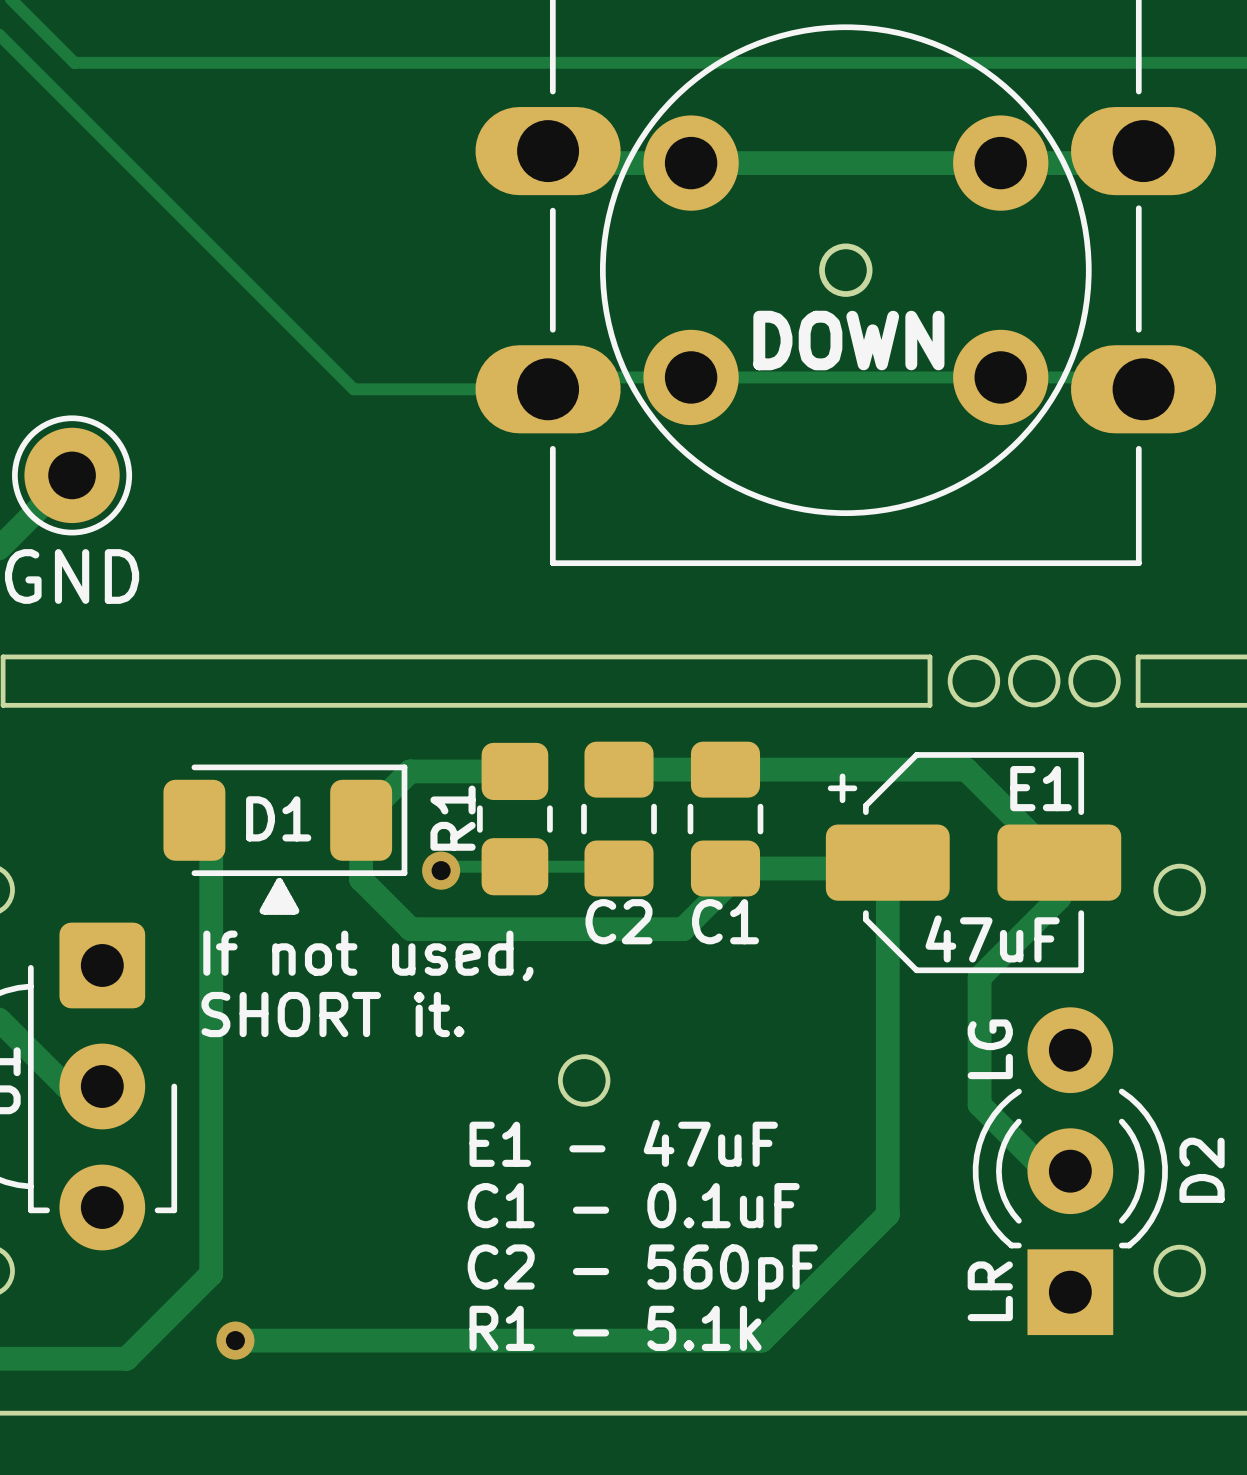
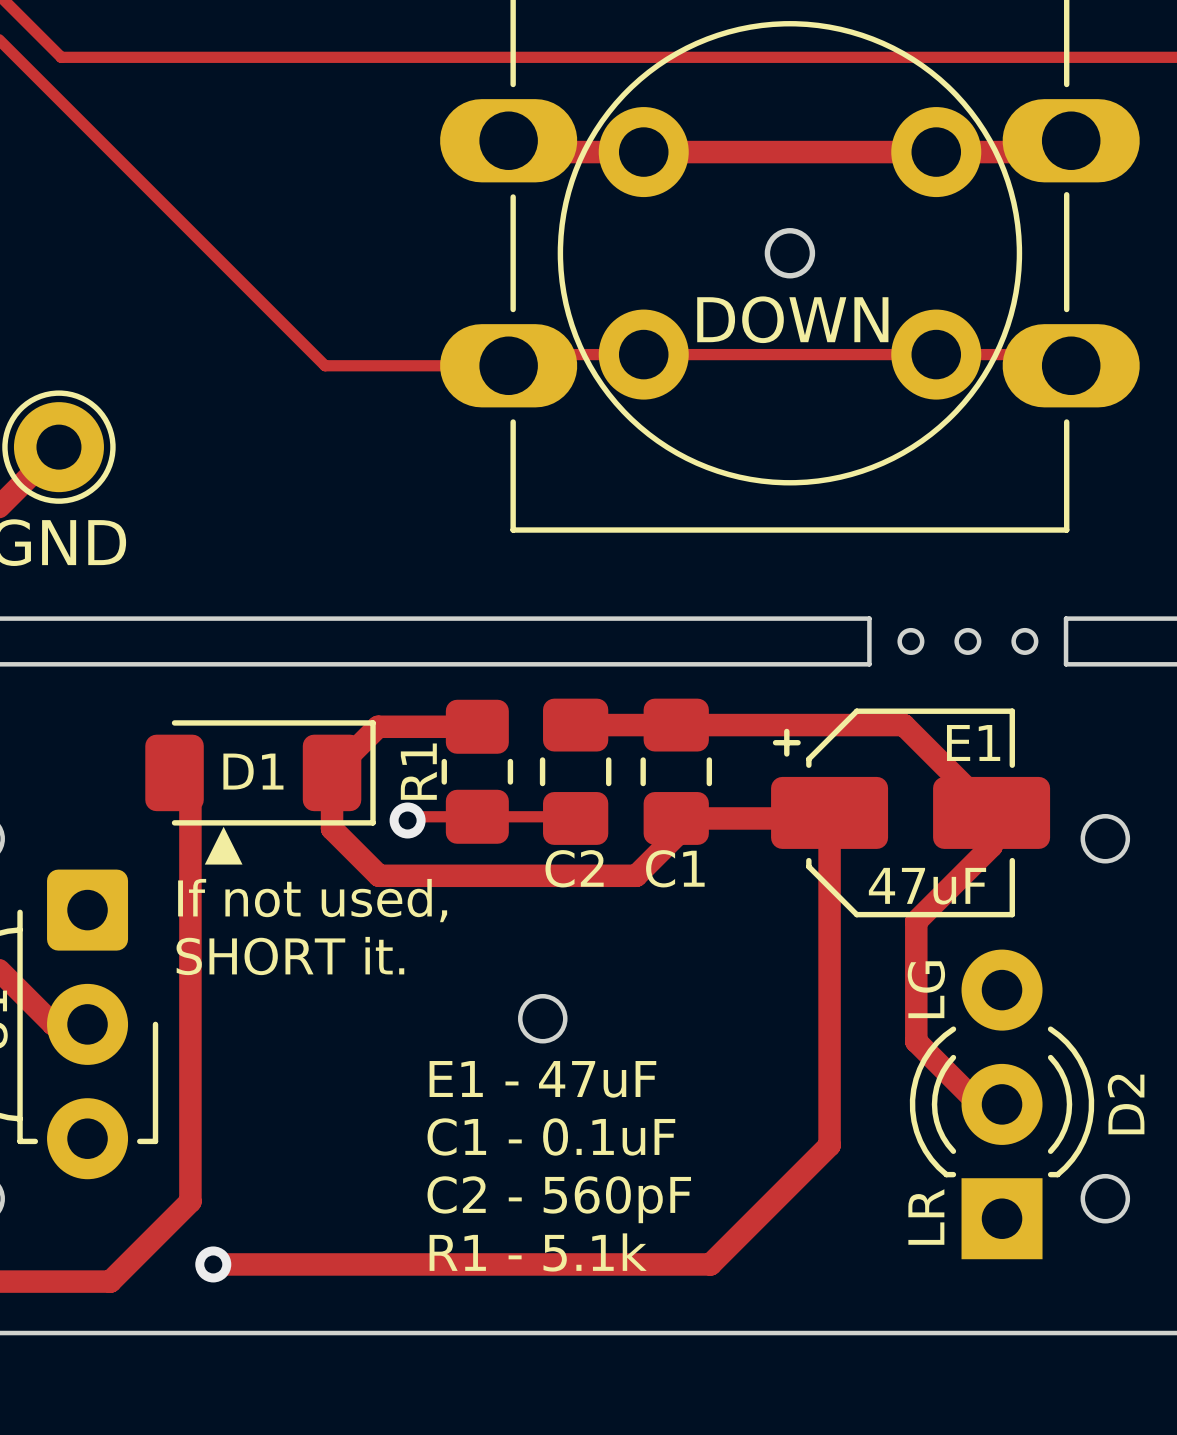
round board edge size: [947, 654, 1001, 708] -> [897, 627, 925, 655]
round board edge size: [1008, 654, 1061, 708] -> [954, 627, 982, 655]
round board edge size: [1068, 654, 1121, 708] -> [1011, 627, 1039, 655]

